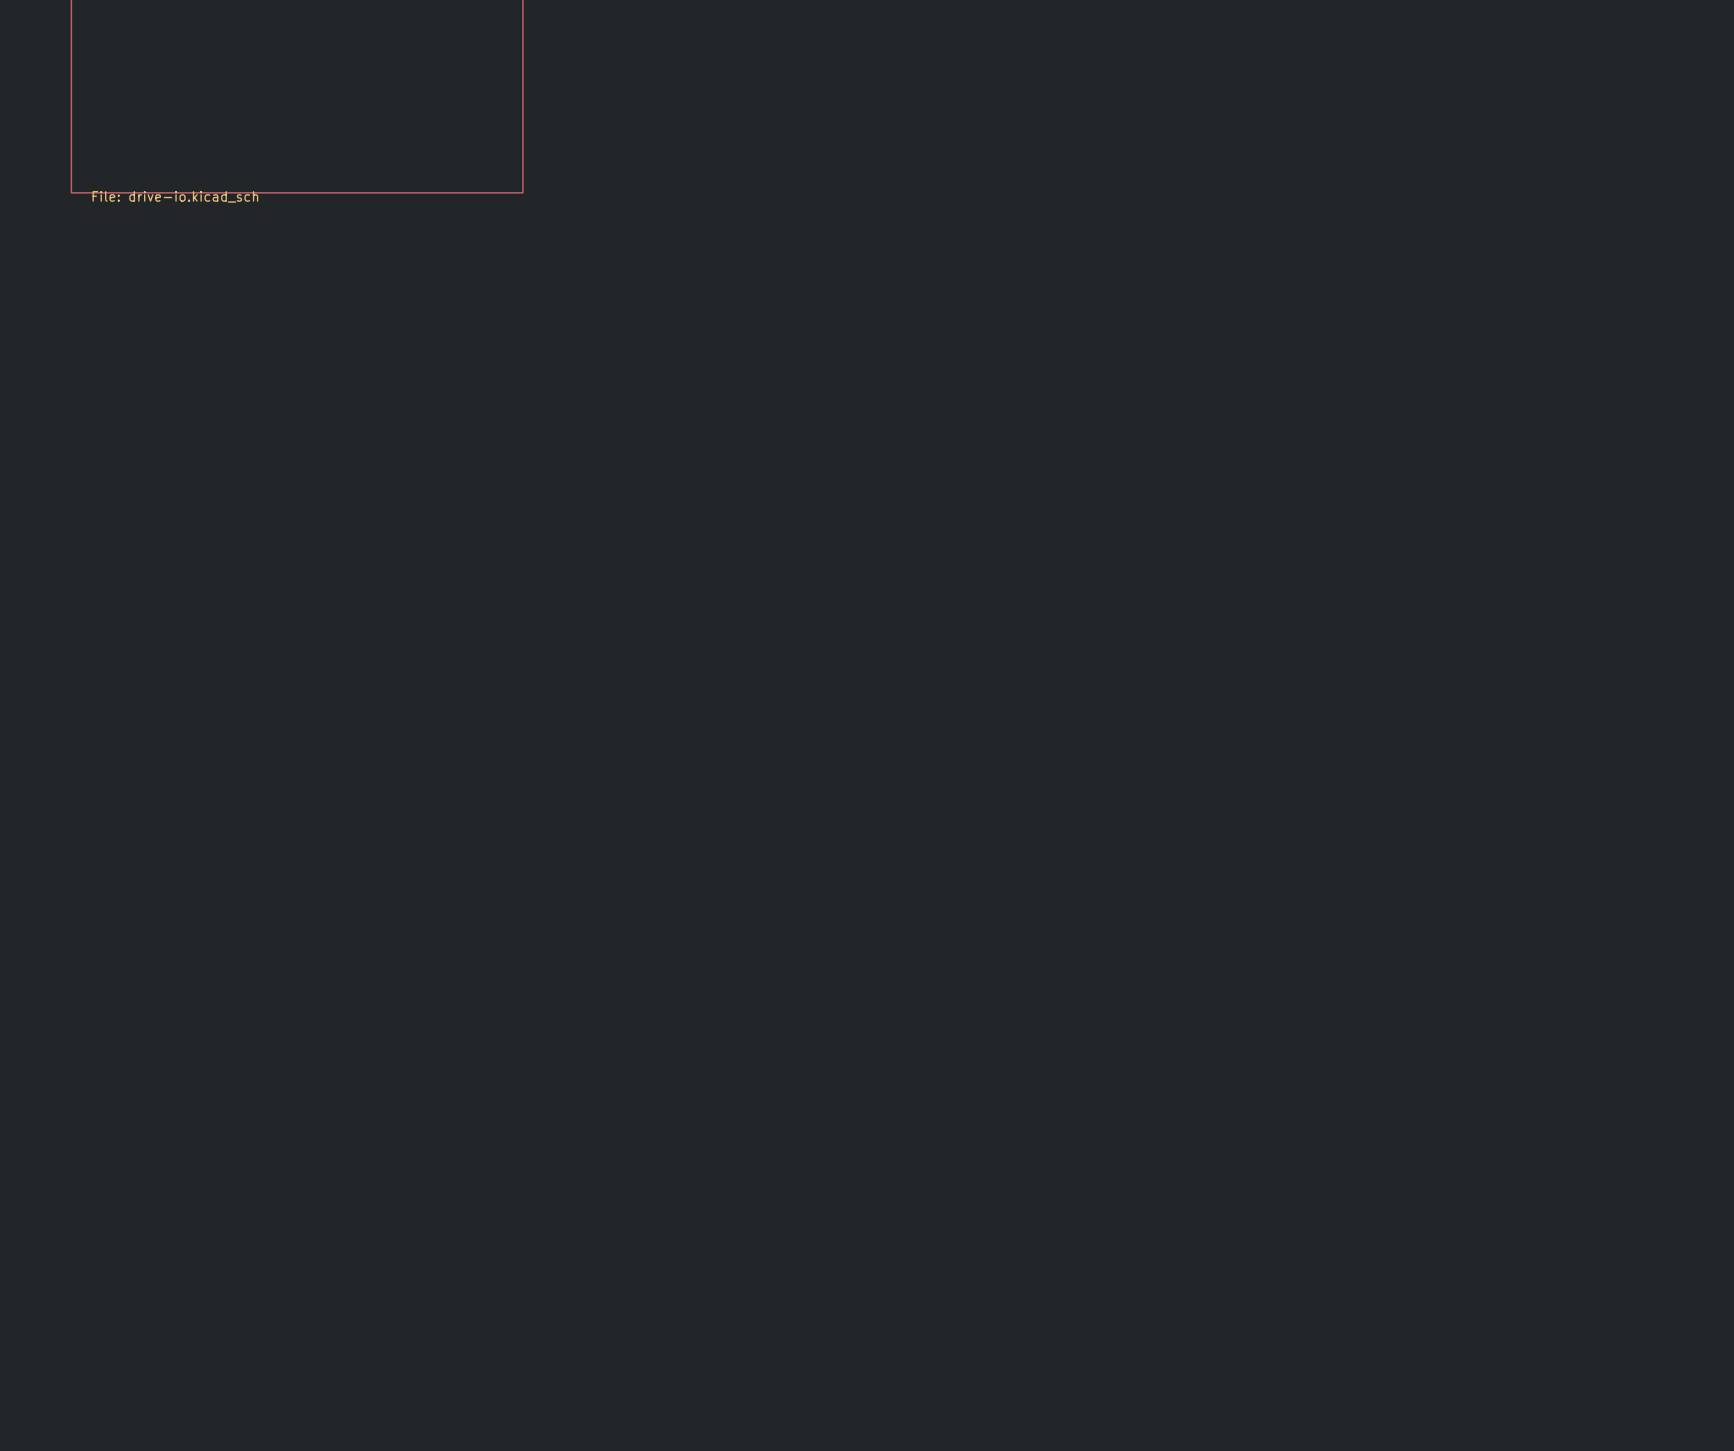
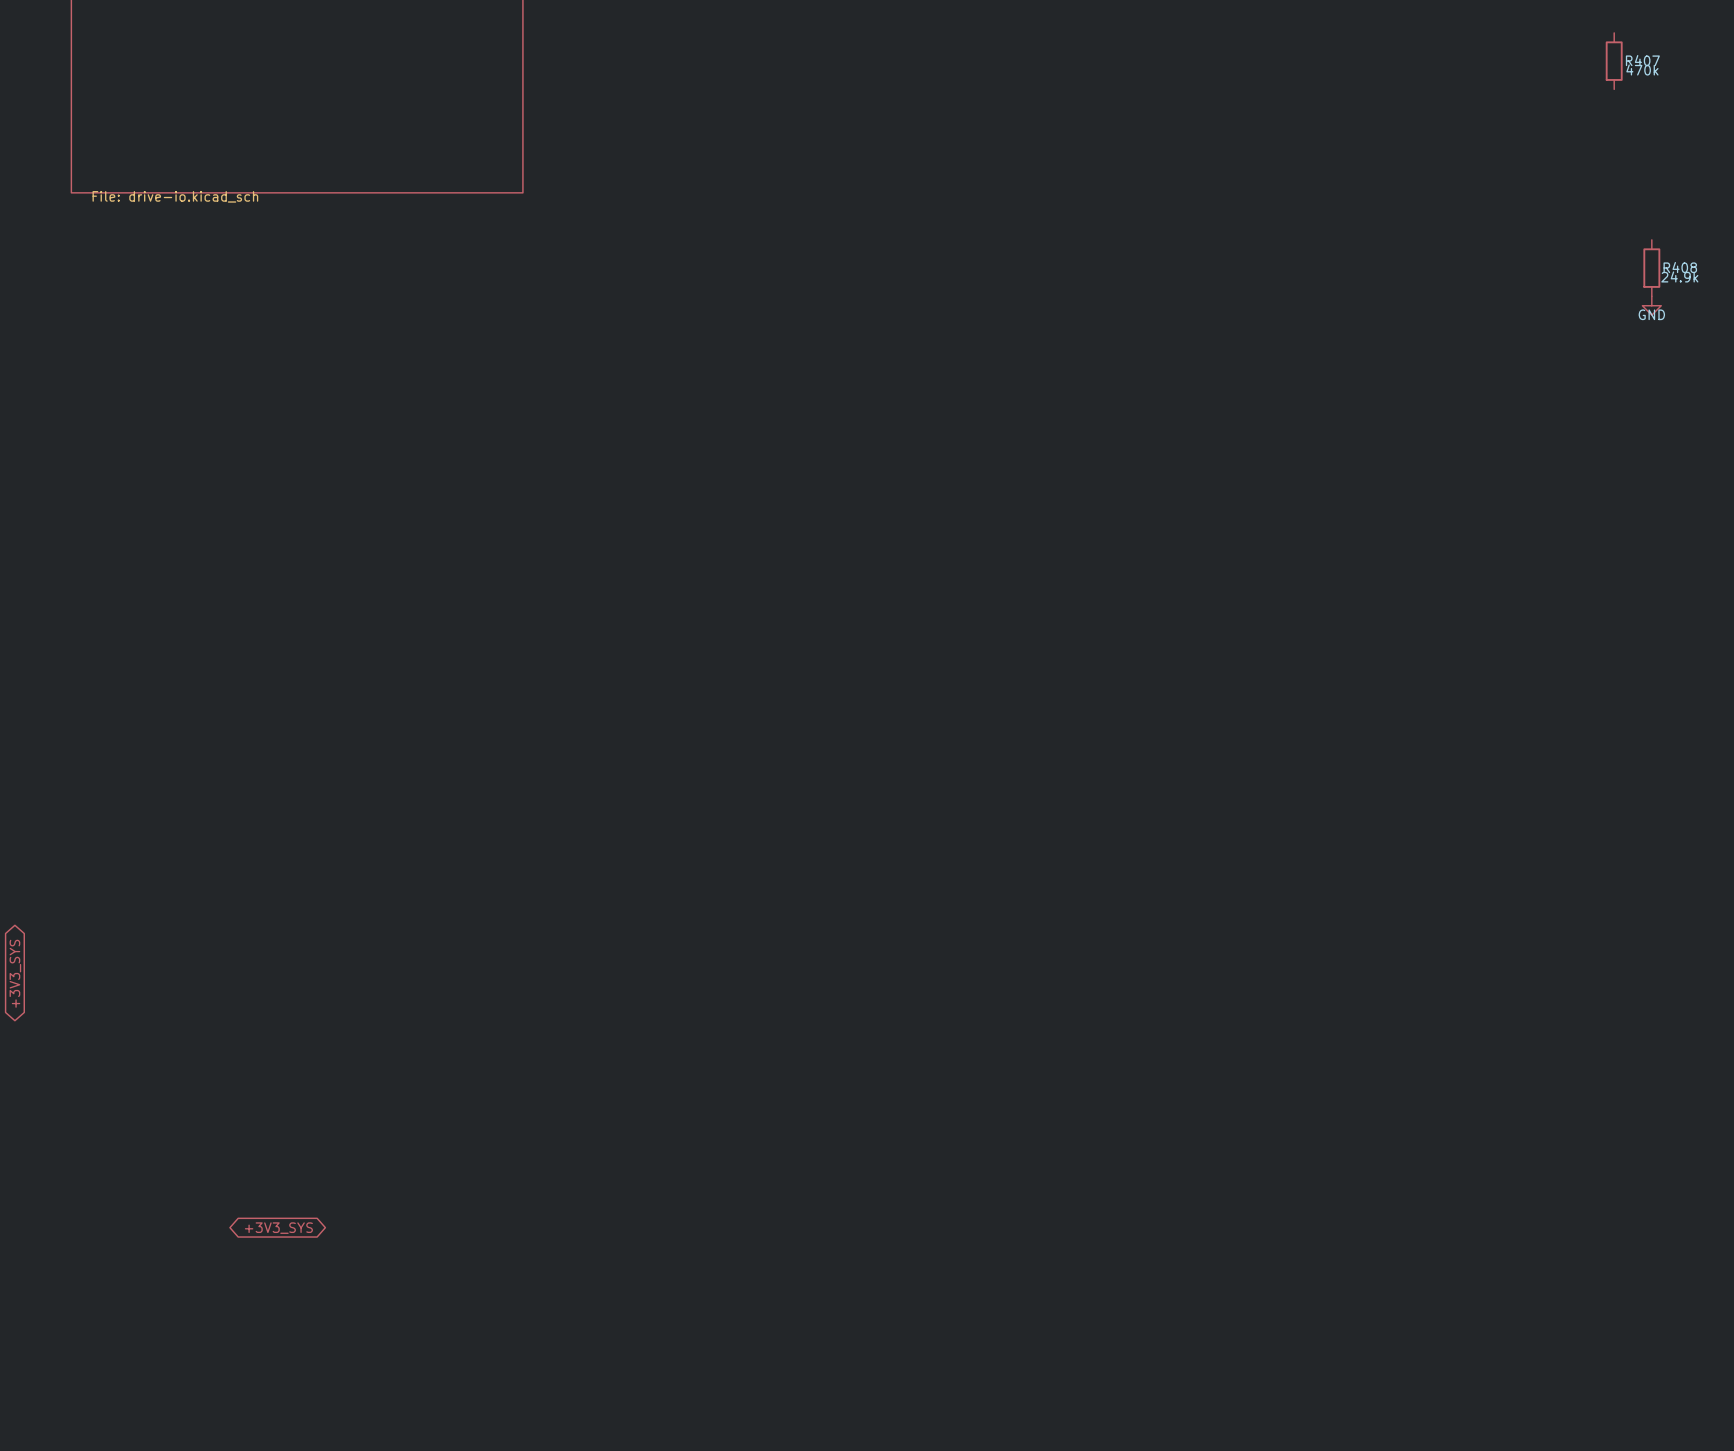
R407: none -> 470k (1614, 61)
R408: none -> 24.9k (1651, 268)
power symbol: none -> GND (1651, 305)
global label: none -> +3V3_SYS (15, 973)
global label: none -> +3V3_SYS (278, 1228)

